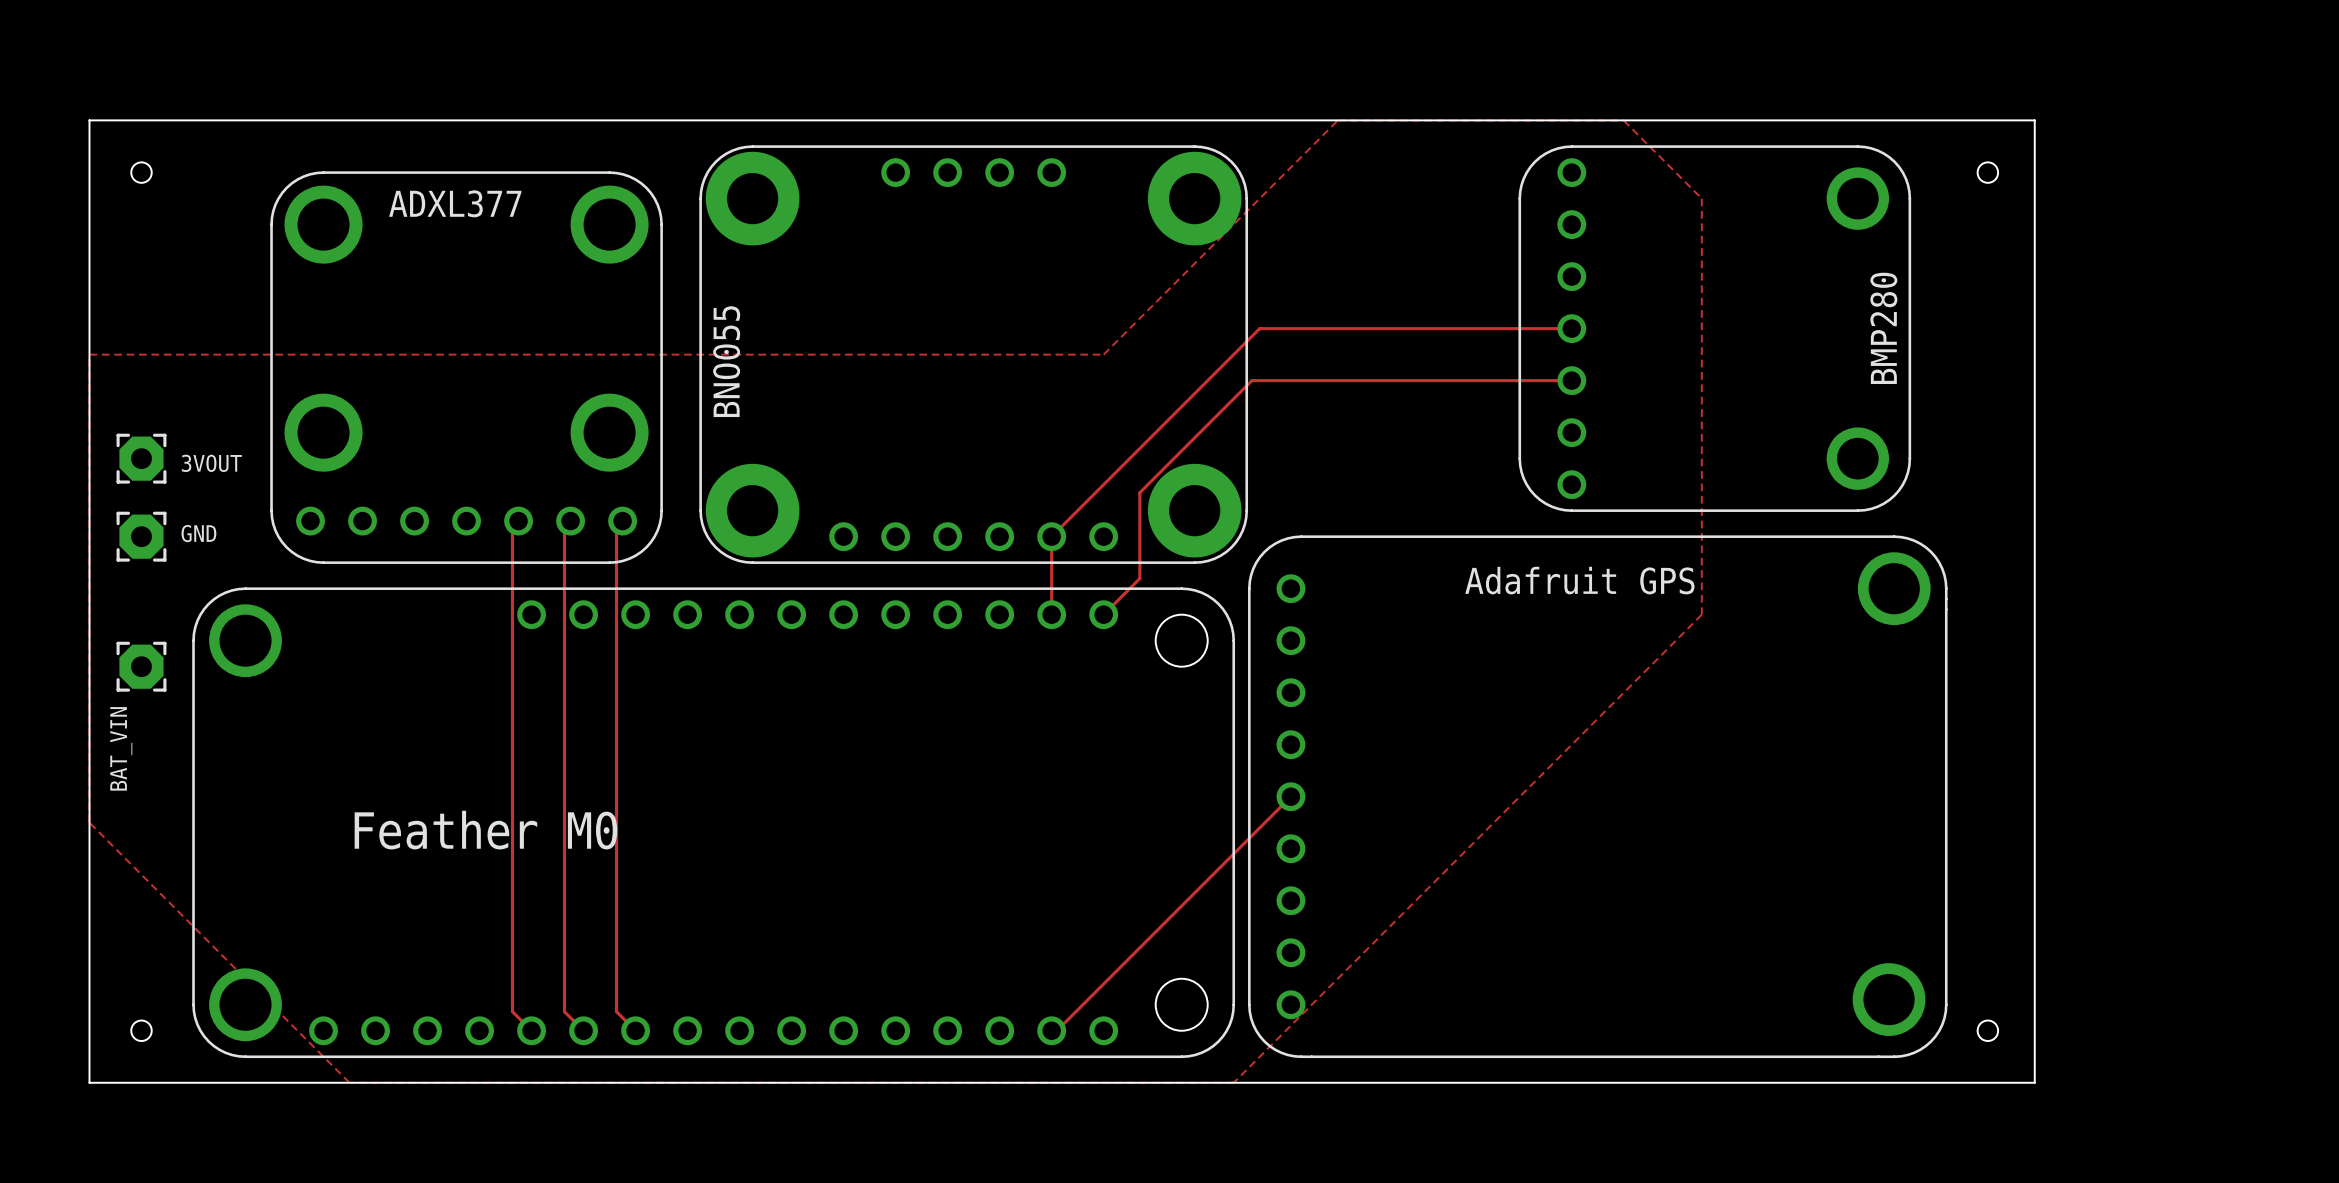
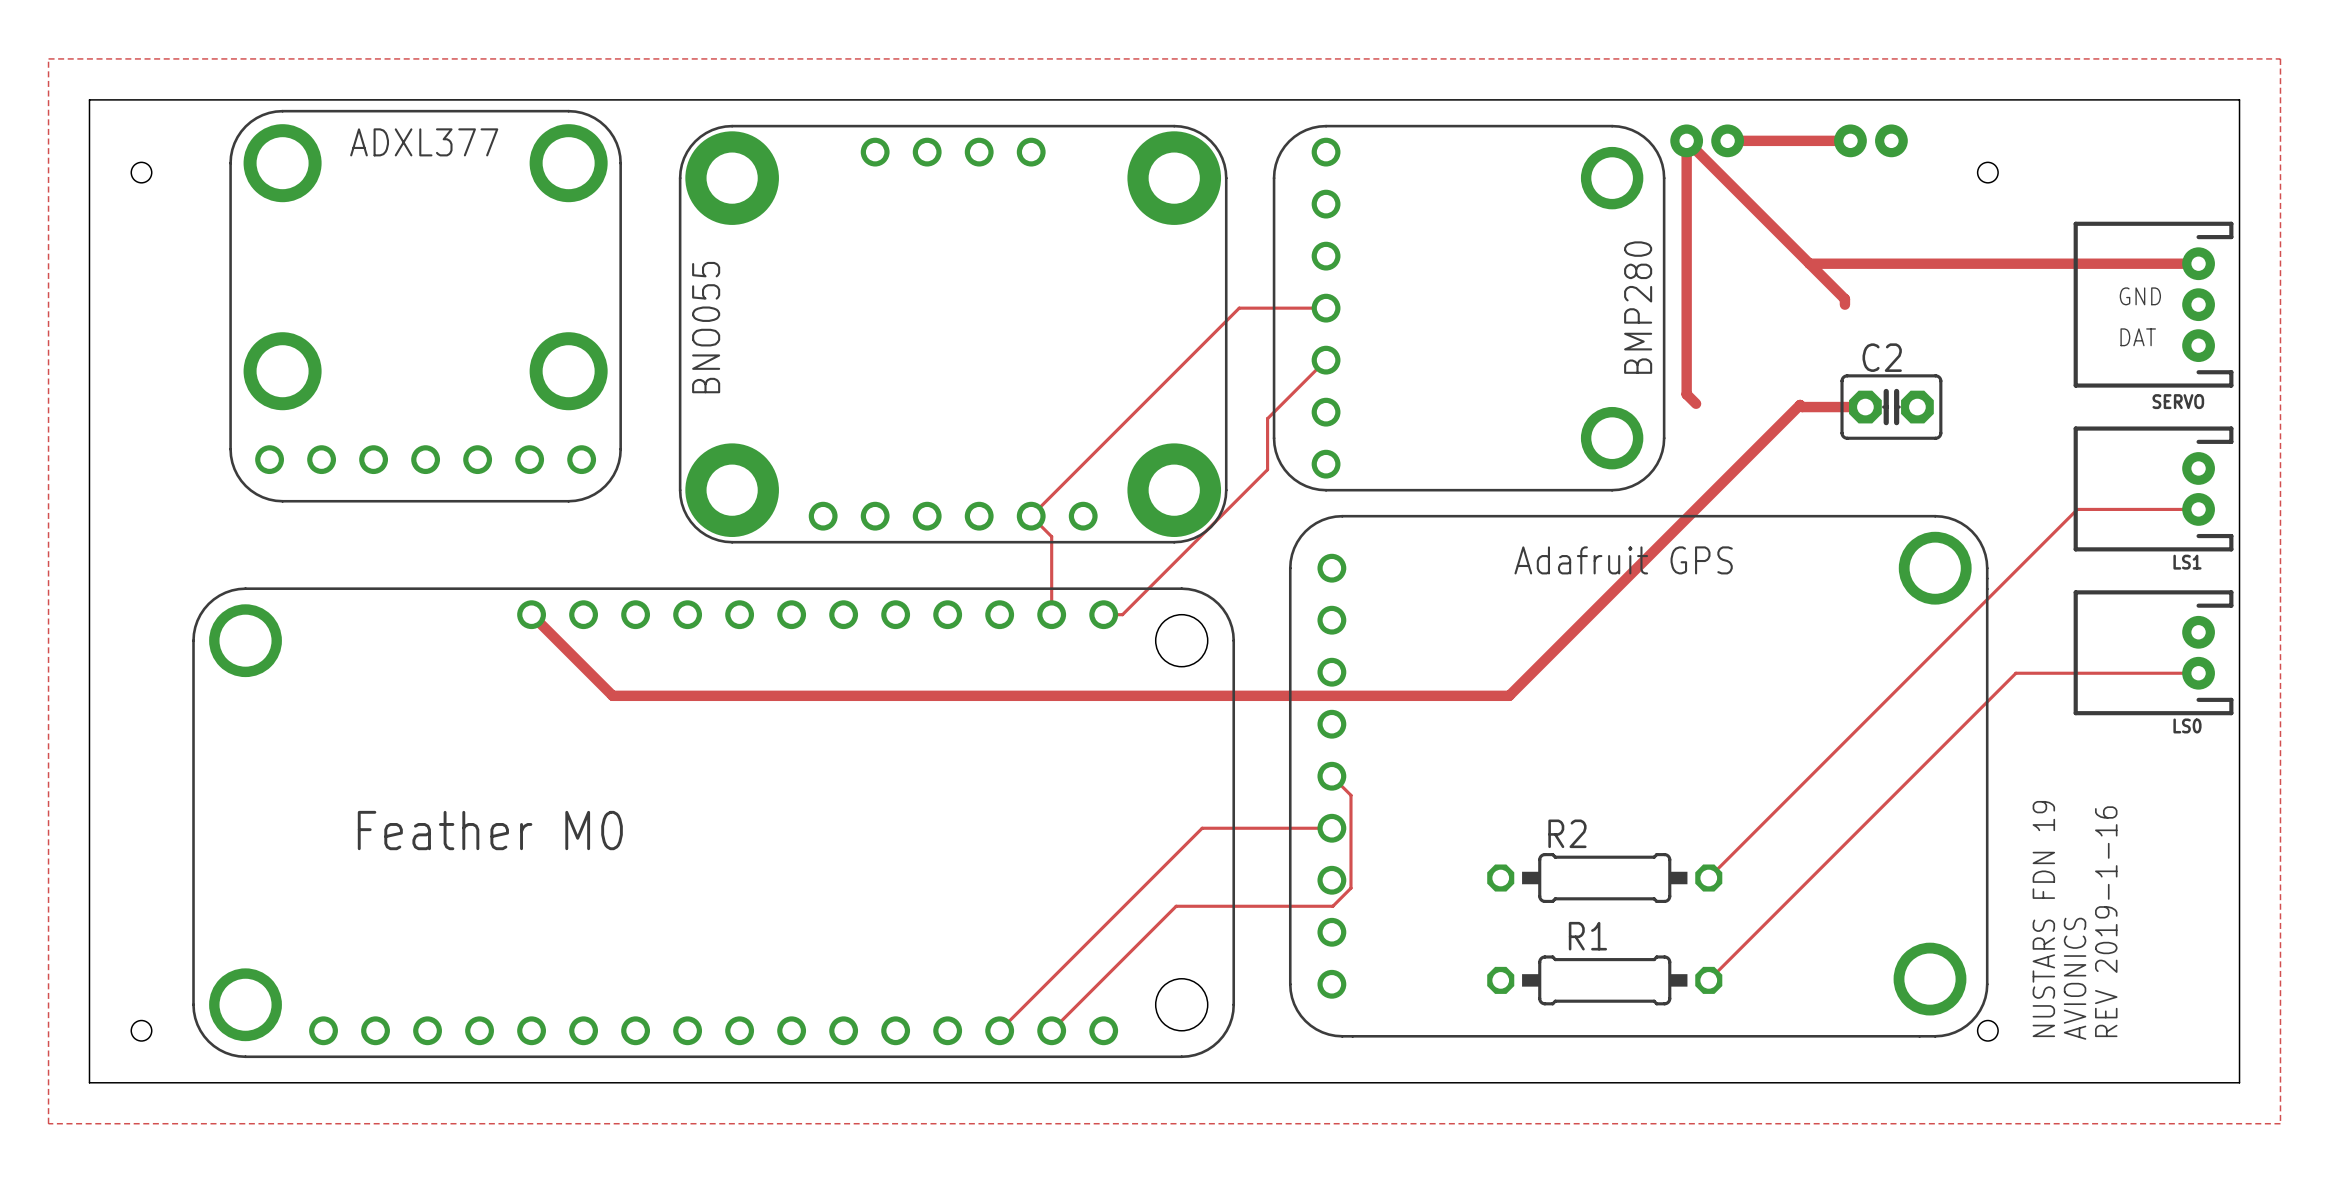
board edge: (89, 120) (2034, 120) (2034, 1082) -> (89, 120) (89, 99) (2239, 99) (2239, 1082) (2034, 1082)
zone outline: (1337, 120) (1103, 354) (89, 354) (89, 822) (349, 1082) (1233, 1082) (1701, 614) (1701, 198) (1623, 120) (1337, 120) -> (48, 58) (48, 1123) (2280, 1123) (2280, 58) (48, 58)
part: none -> (1707, 140)
track: none -> (1727, 140) (1850, 140)
part: none -> (1870, 140)
track: none -> (1809, 263) (2198, 263)
text: none -> GND (2140, 296)
track: none -> (1844, 304) (1844, 299) (1686, 140) (1686, 394) (1696, 403)
SERVO: none -> (2153, 304)
track: (1571, 328) (1259, 328) (1051, 536) -> (1326, 308) (1239, 308) (1031, 516) (1051, 536)
part position: (1714, 328) -> (1469, 308)
text: none -> DAT (2138, 337)
part position: (973, 354) -> (953, 334)
part position: (466, 367) -> (425, 306)
track: (1571, 380) (1251, 380) (1139, 492) (1139, 578) (1103, 614) -> (1326, 360) (1267, 418) (1267, 469) (1122, 614) (1103, 614)
track: none -> (1865, 407) (1802, 407) (1800, 404) (1509, 695) (612, 695) (531, 614)
C2: none -> (1891, 407)
3VOUT: (141, 458) -> none
LS1: none -> (2153, 488)
track: none -> (2198, 509) (2077, 509) (1708, 878)
track: (518, 521) (512, 527) (512, 1011) (531, 1030) -> none
track: (570, 521) (564, 527) (564, 1011) (583, 1030) -> none
track: (622, 521) (616, 527) (616, 1011) (635, 1030) -> none
GND: (141, 536) -> none
LS0: none -> (2153, 652)
BAT_VIN: (141, 666) -> none
track: none -> (2198, 673) (2015, 673) (1708, 980)
track: (1290, 796) (1056, 1030) (1051, 1030) -> (1331, 776) (1350, 795) (1350, 888) (1332, 906) (1176, 906) (1051, 1030)
part position: (1597, 796) -> (1638, 776)
track: none -> (1331, 828) (1202, 828) (999, 1030)
R2: none -> (1604, 878)
text: none -> NUSTARS FDN 19 (2043, 919)
text: none -> REV 2019-1-16 (2106, 921)
R1: none -> (1604, 980)
text: none -> AVIONICS (2075, 978)

